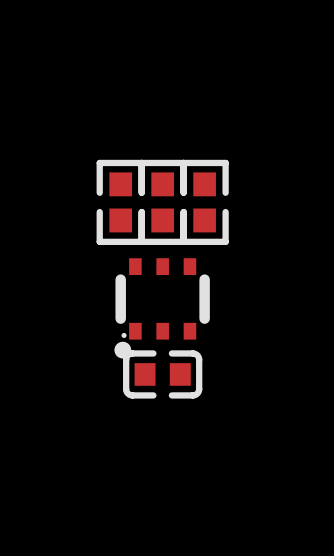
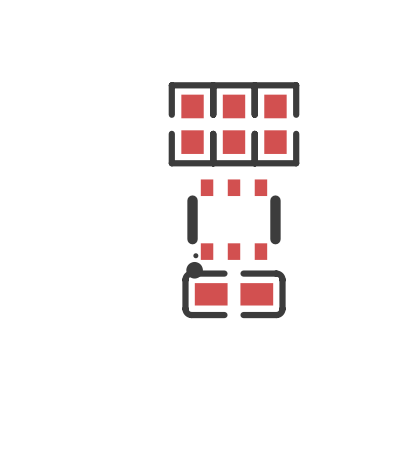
part footprint: [123, 350, 203, 399] -> [182, 270, 286, 319]

